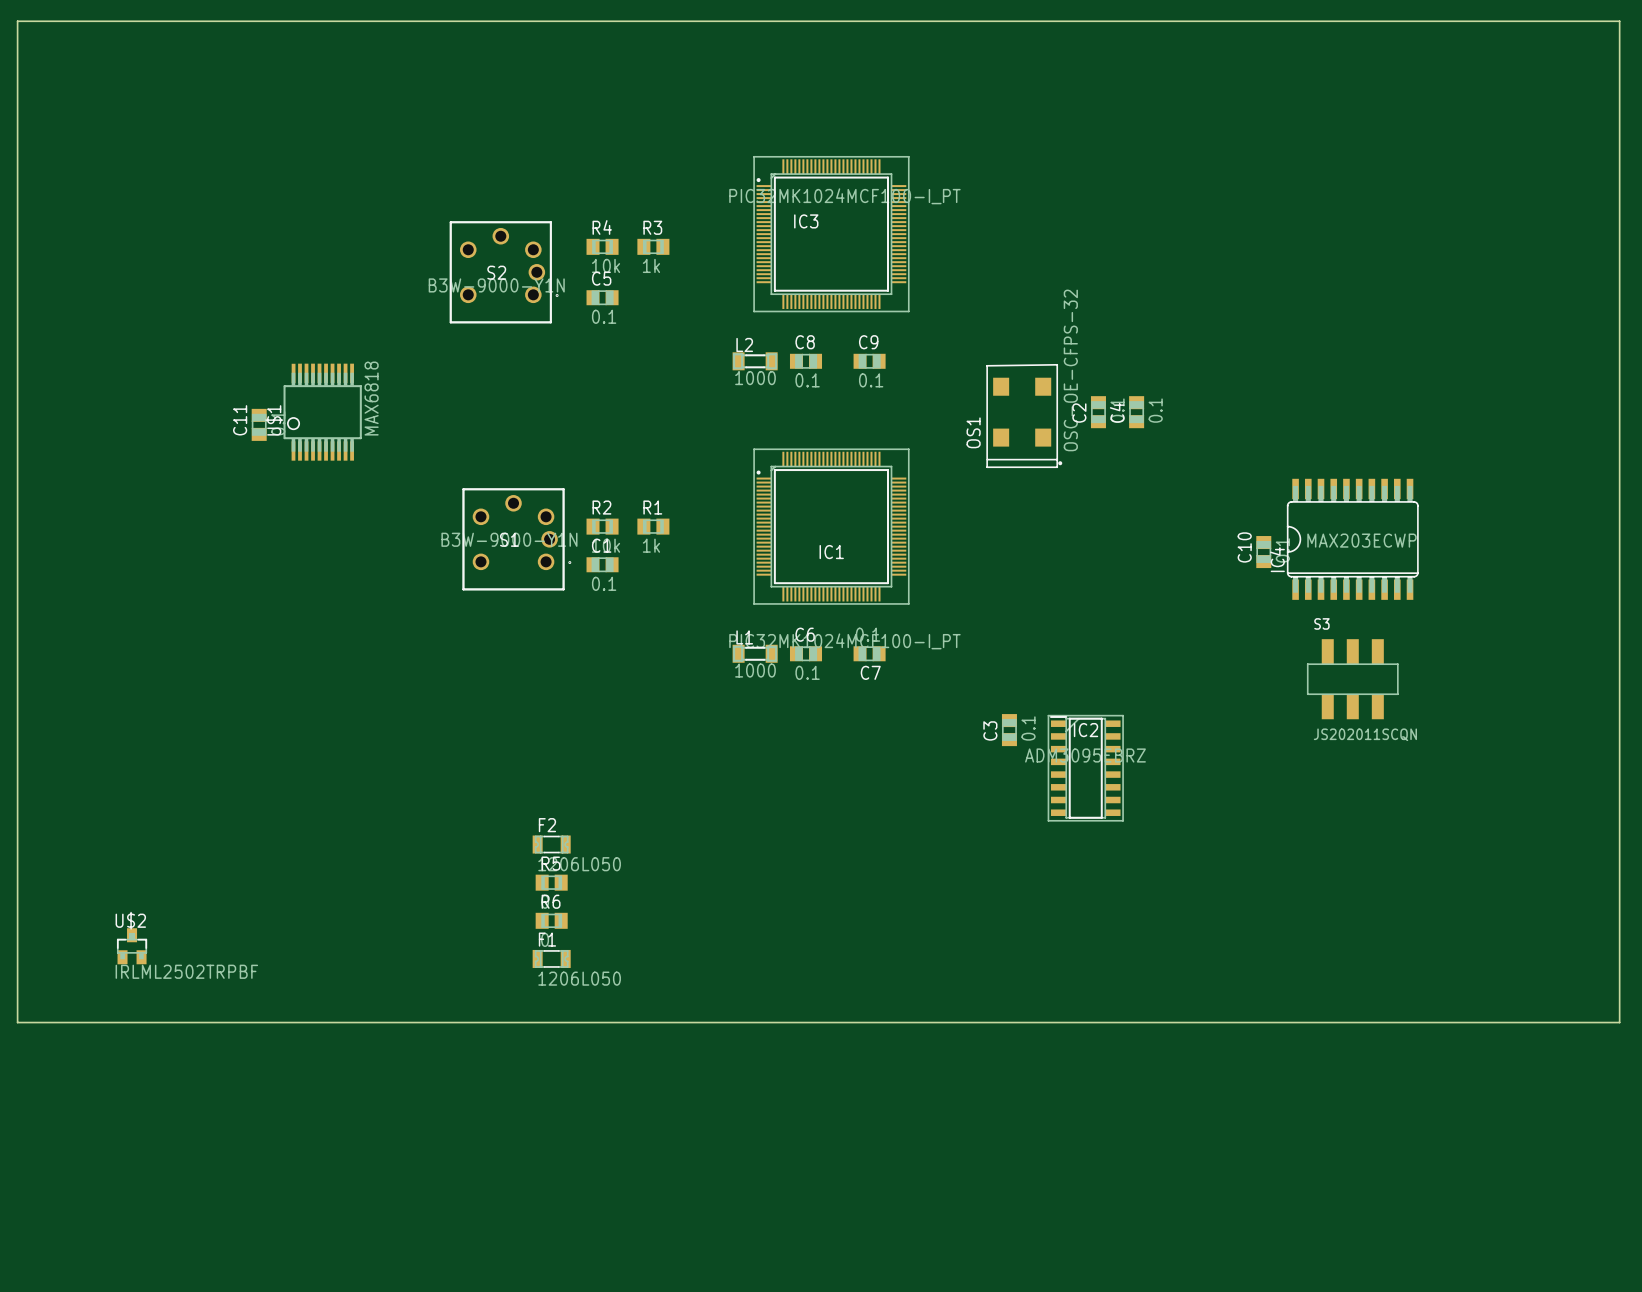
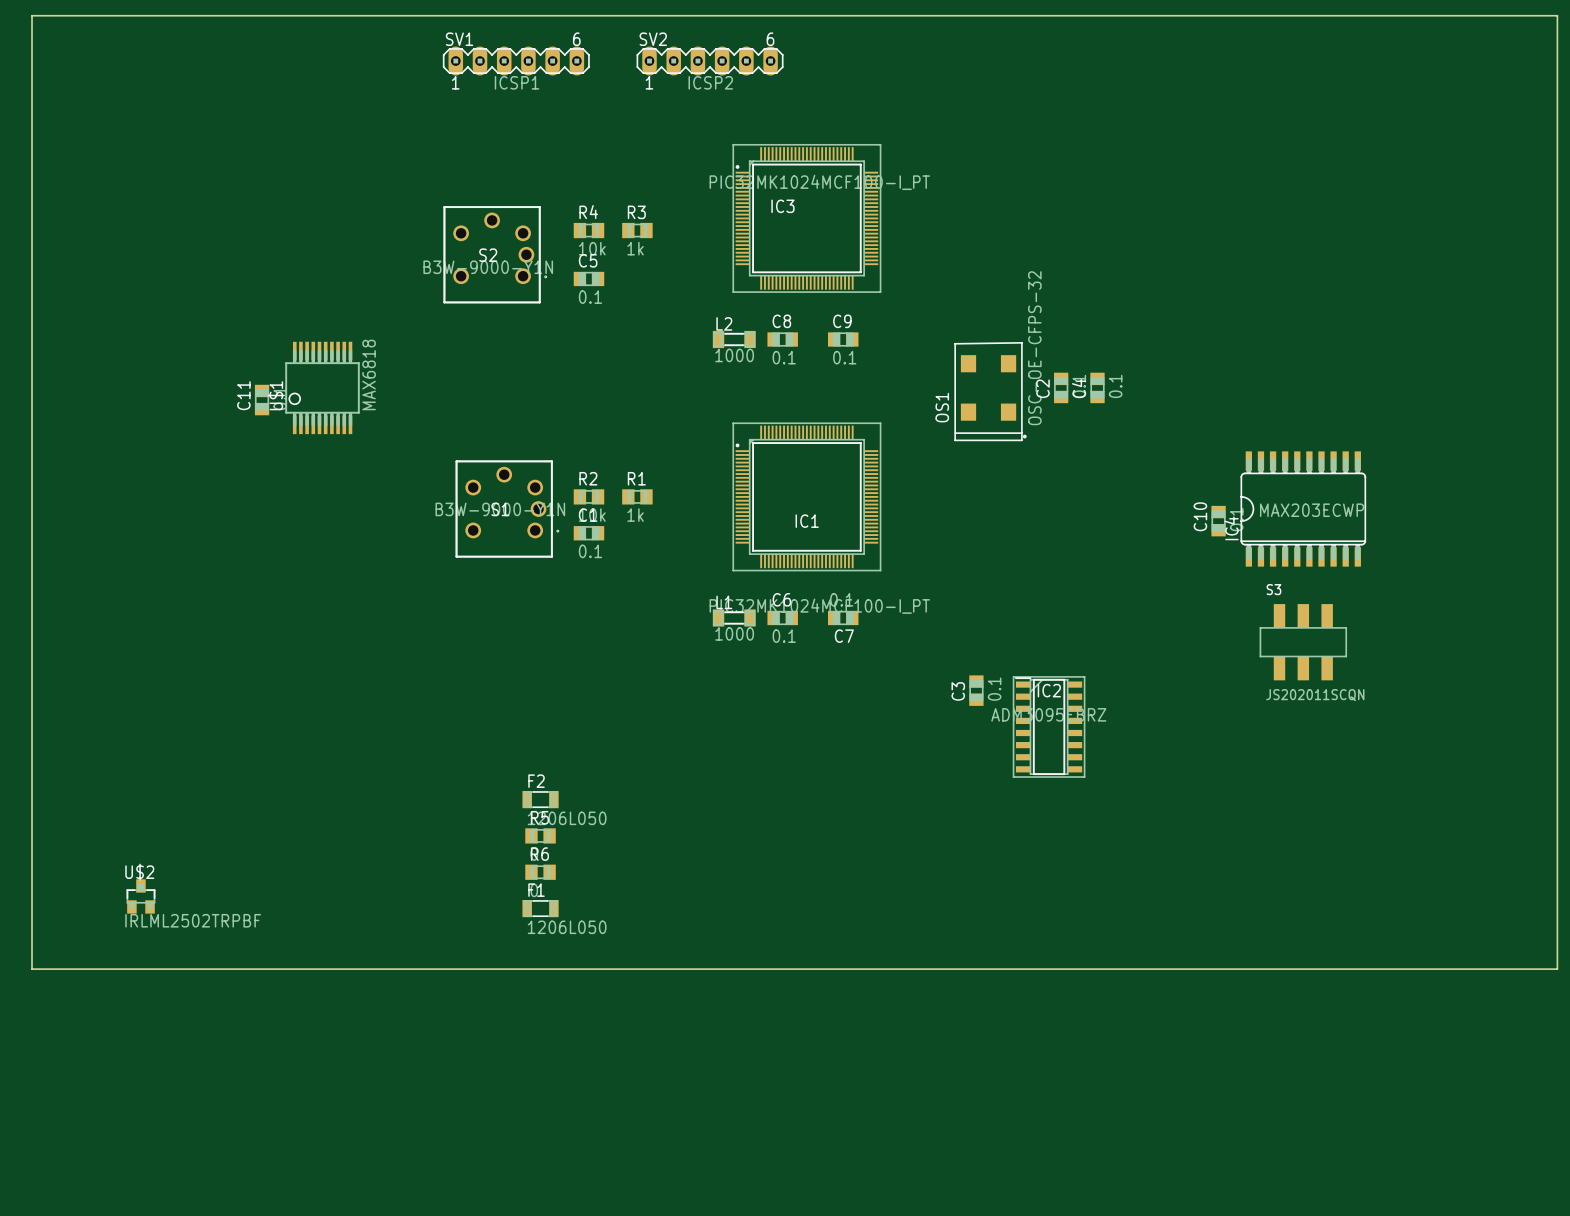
SV1: none -> ICSP1 (516, 61)
SV2: none -> ICSP2 (710, 61)

